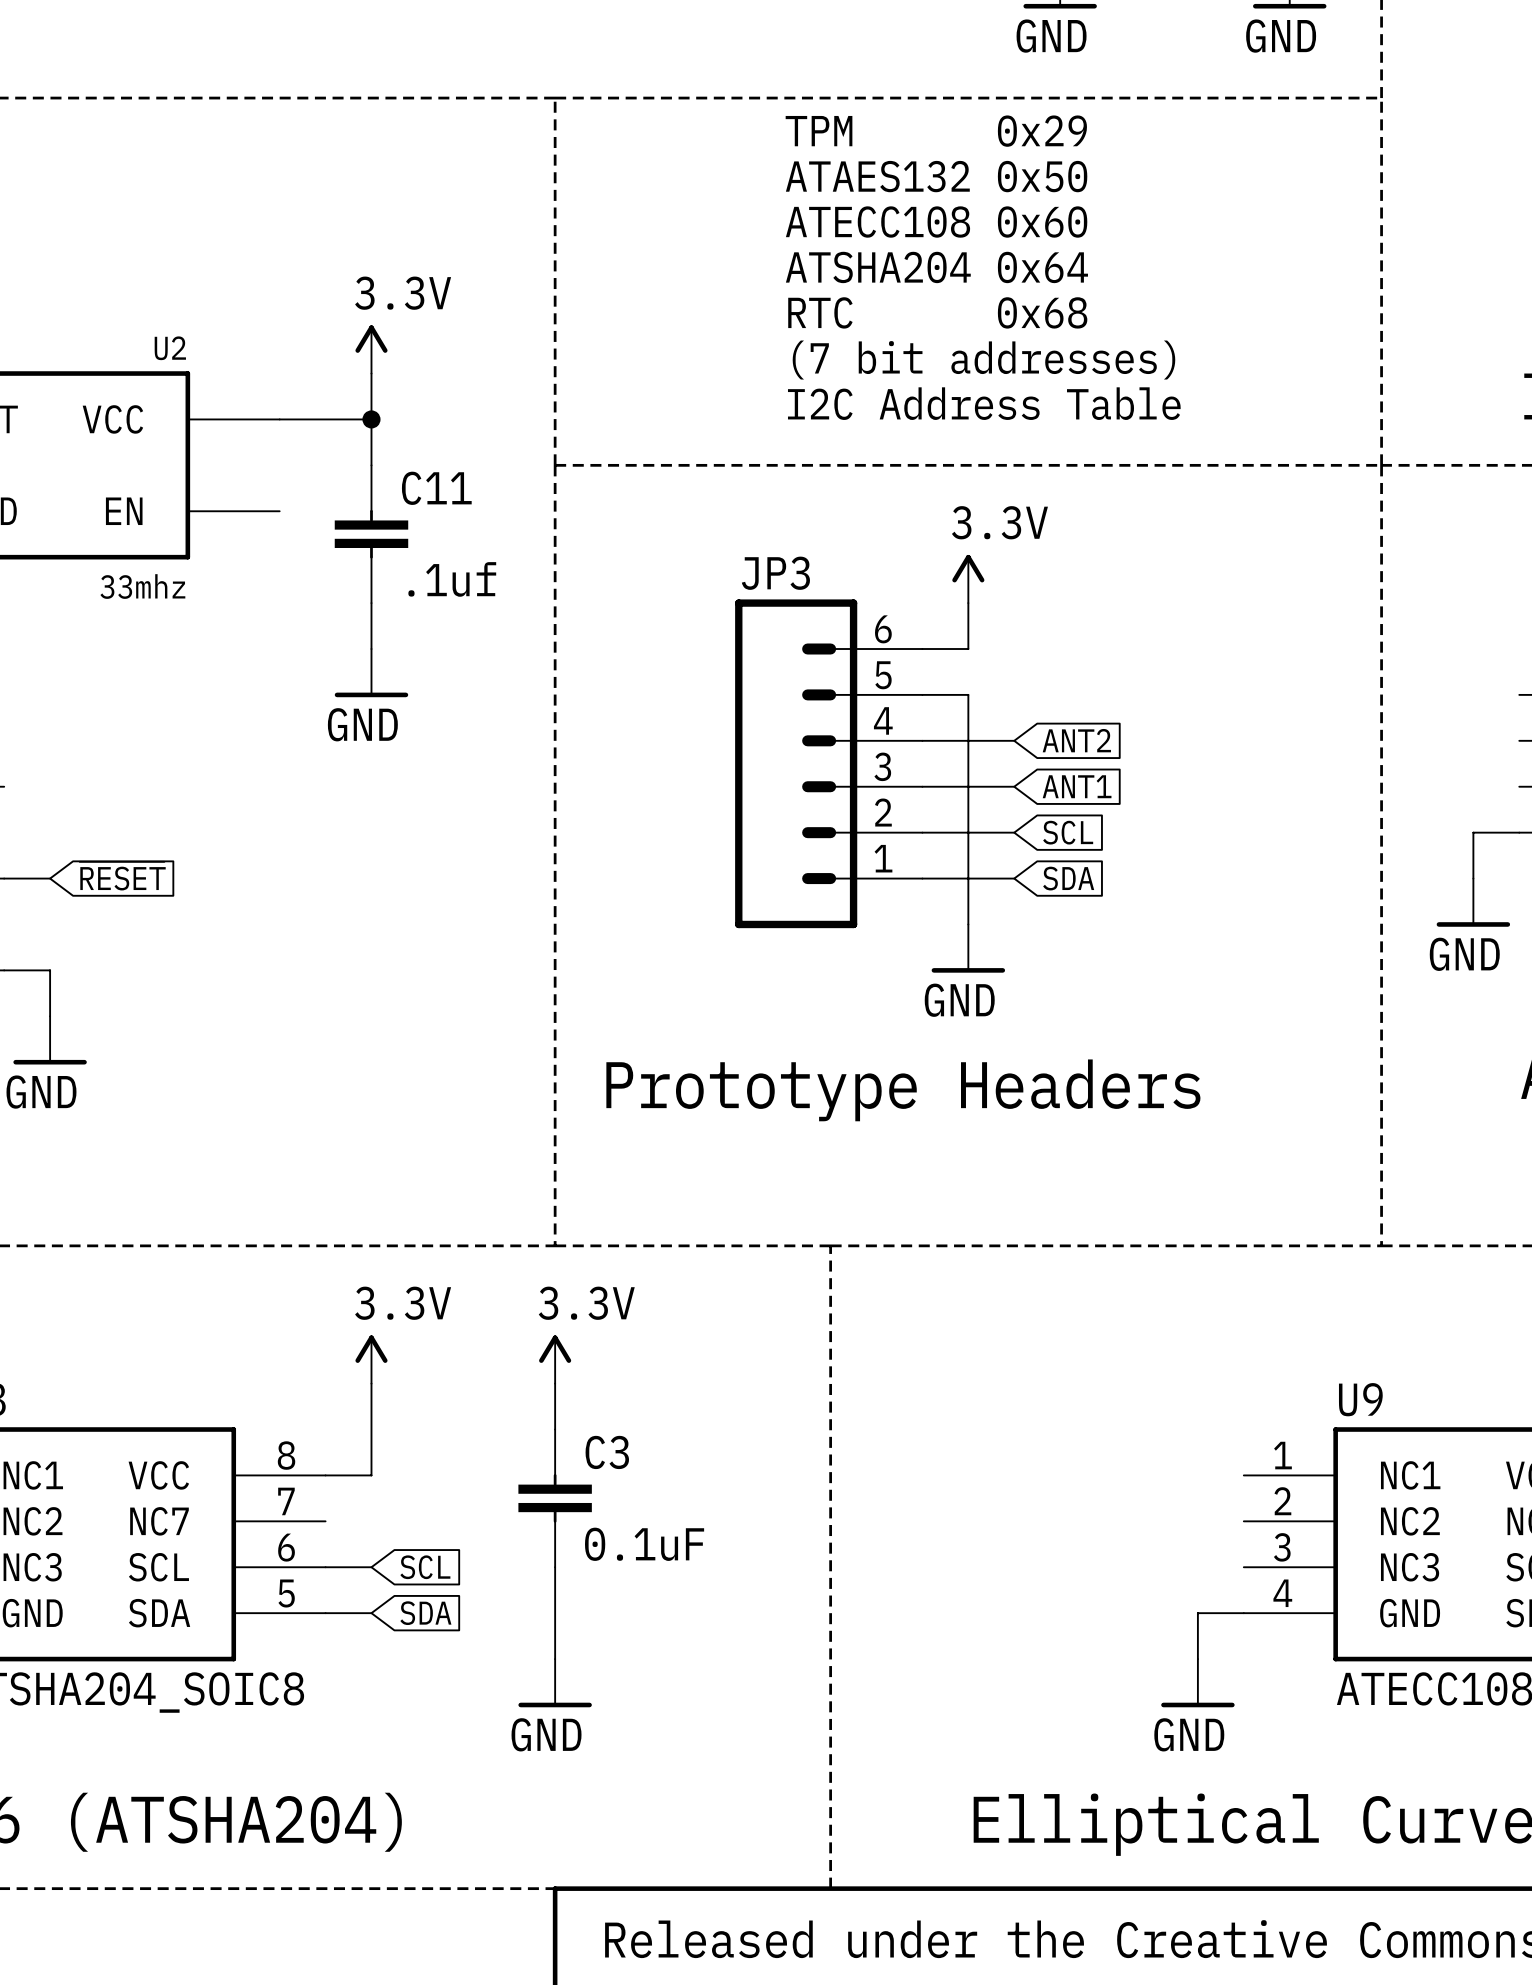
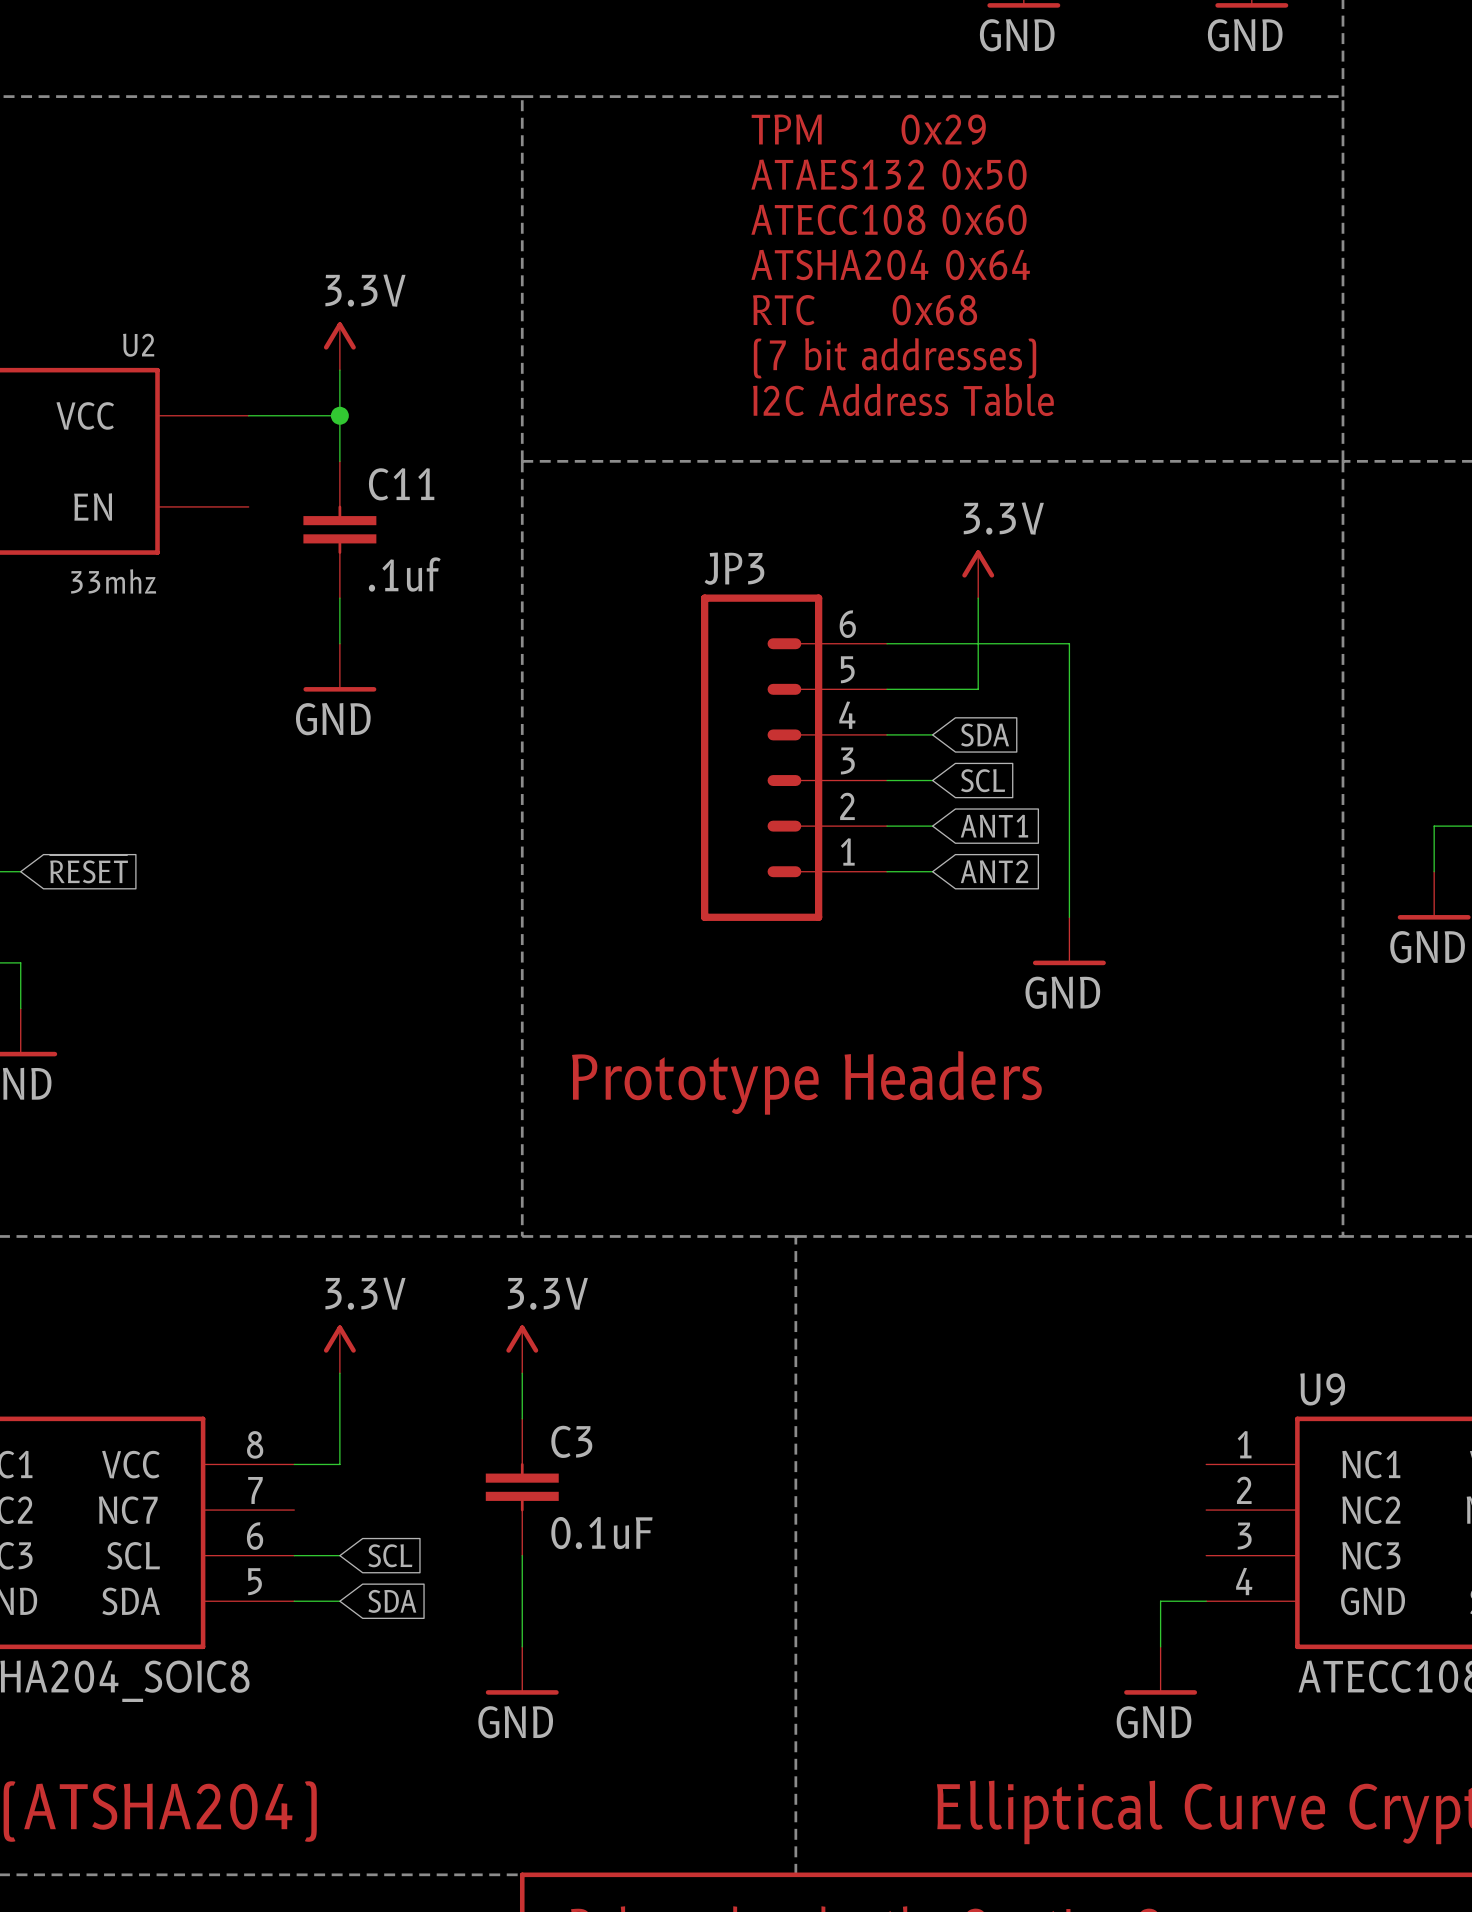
power symbol position: 3.3V (968, 578) -> 3.3V (978, 574)
wire: (968, 603) (968, 649) -> (1069, 917) (1069, 643) (932, 643)
wire: (968, 694) (968, 924) -> (932, 689) (978, 689) (978, 598)
wire: (968, 740) (1014, 740) -> none
global label position: ANT2 (1076, 740) -> ANT2 (994, 871)
wire: (968, 786) (1014, 786) -> none
global label position: ANT1 (1077, 786) -> ANT1 (994, 826)
wire: (968, 832) (1014, 832) -> none
global label position: SCL (1068, 832) -> SCL (983, 780)
wire: (968, 878) (1014, 878) -> none
global label position: SDA (1068, 878) -> SDA (985, 735)
power symbol position: GND (968, 948) -> GND (1069, 941)

